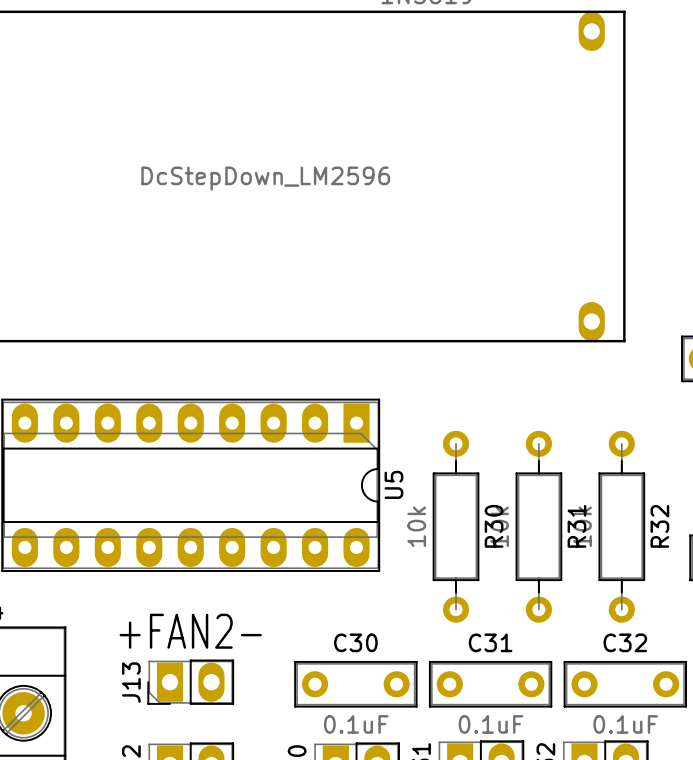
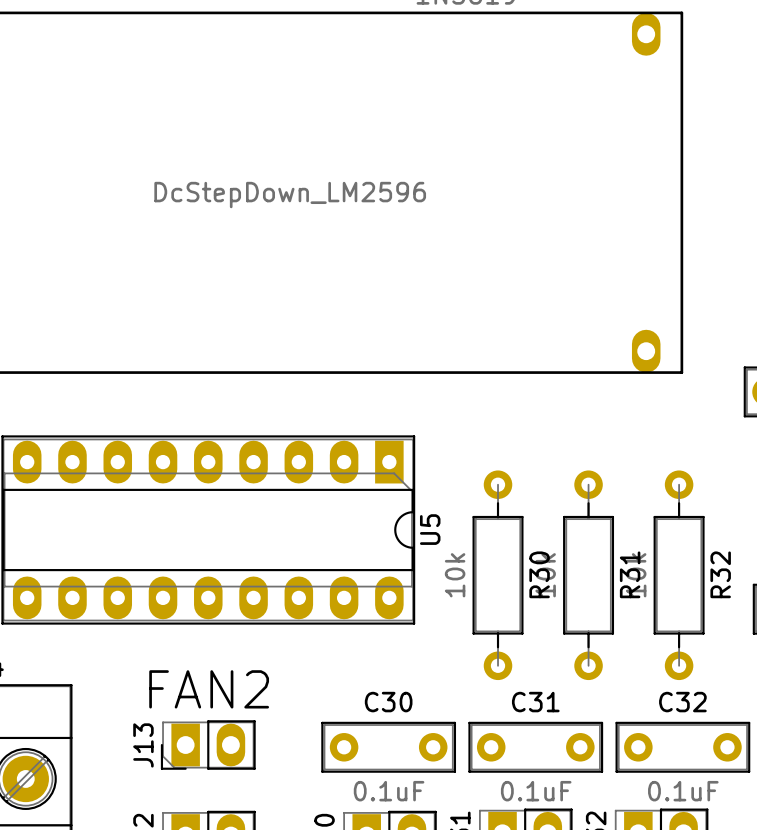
J13 value: +FAN2- (190, 631) -> FAN2 (209, 689)

